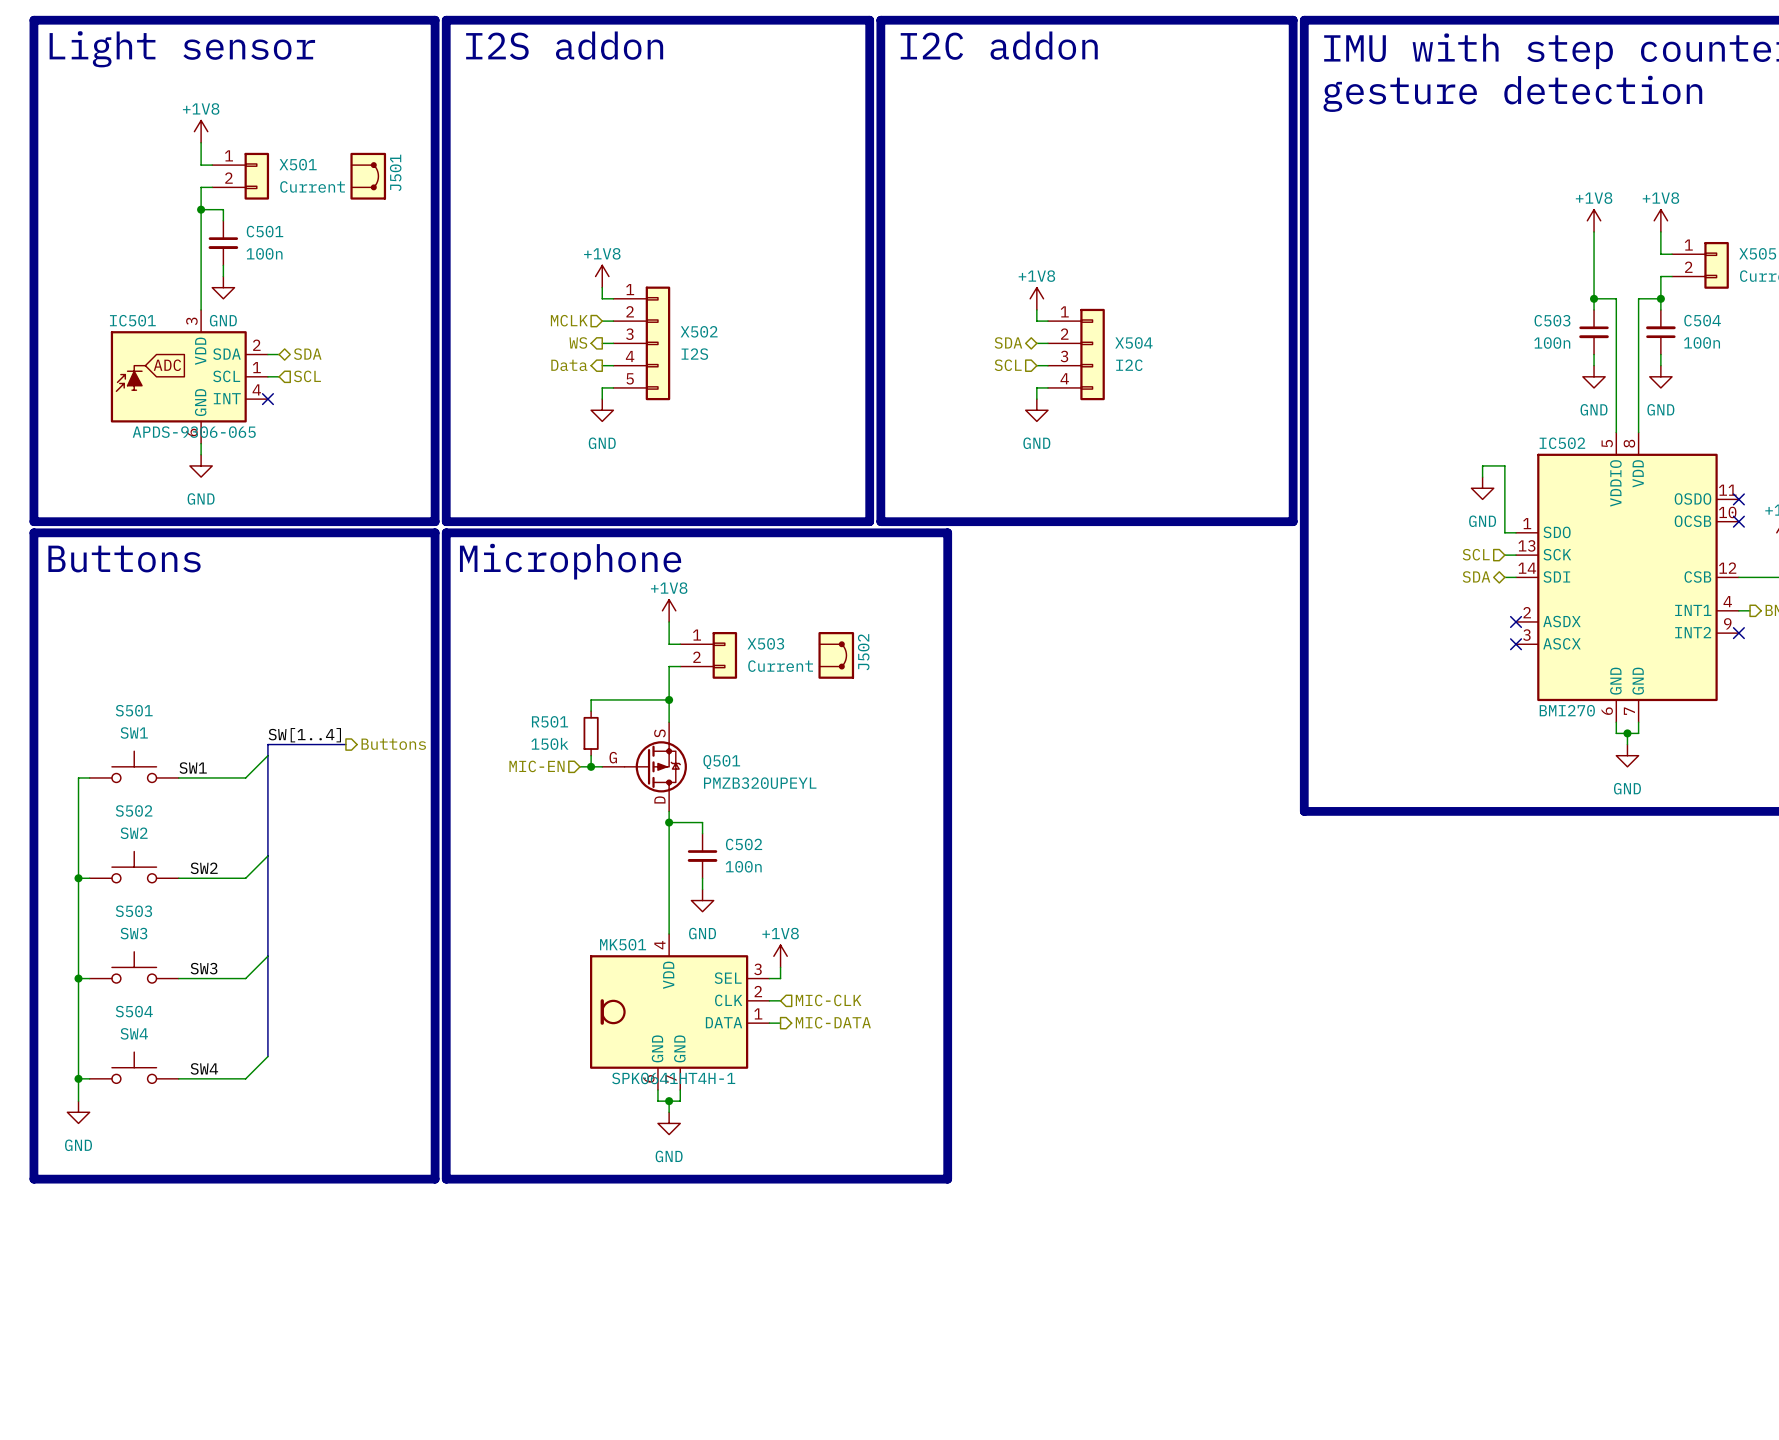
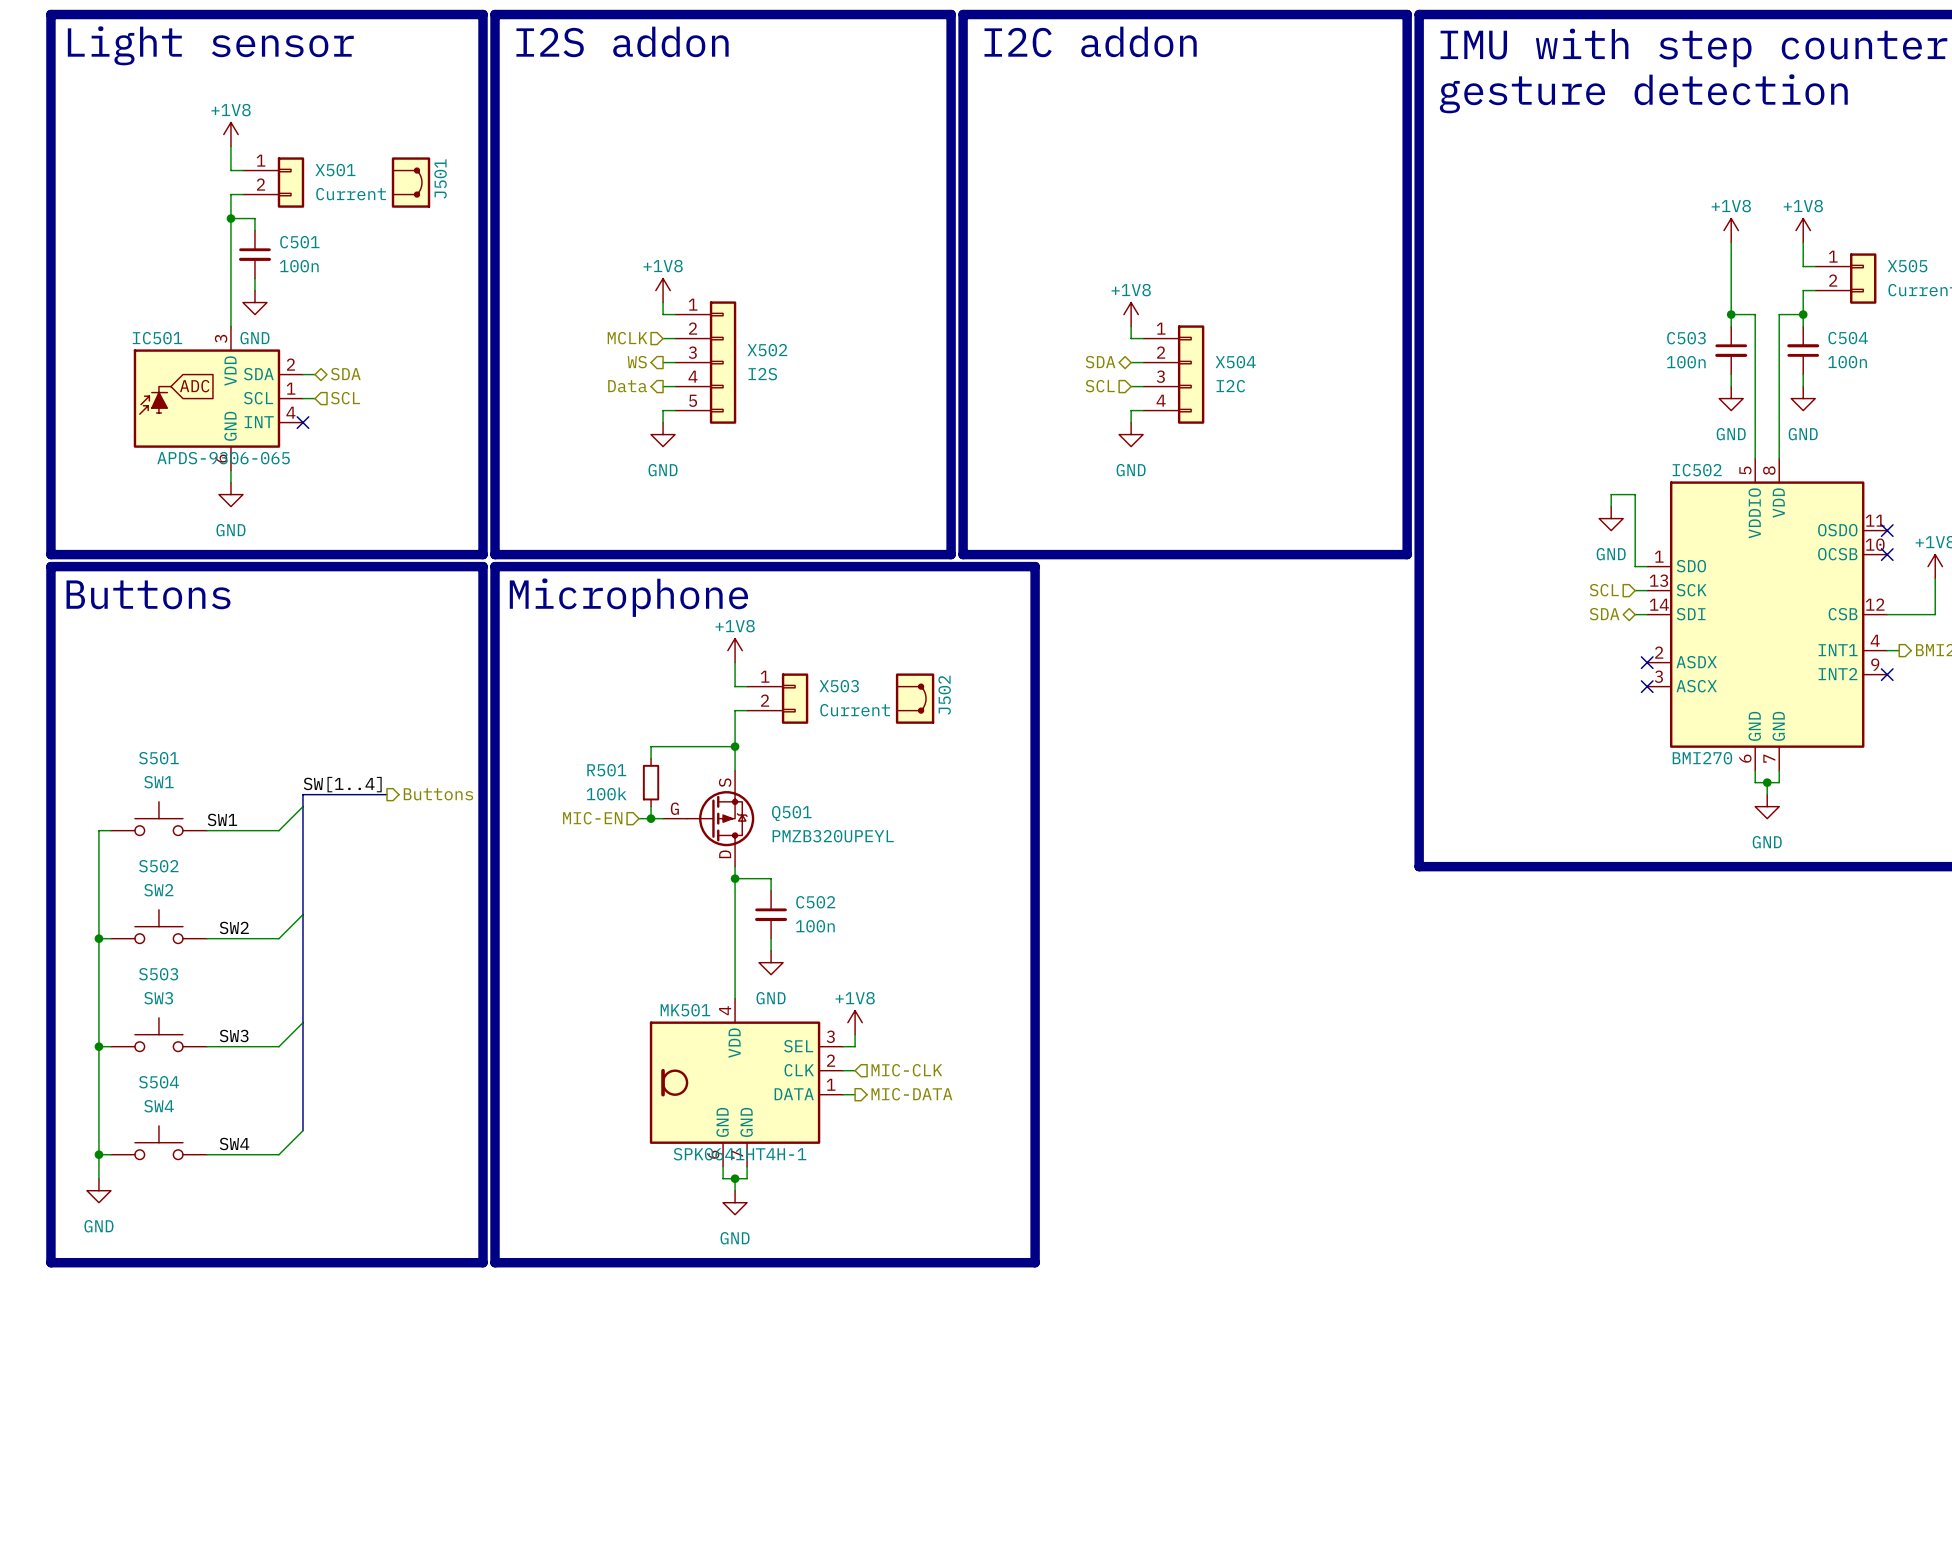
R501 value: 150k (549, 743) -> 100k (606, 793)

